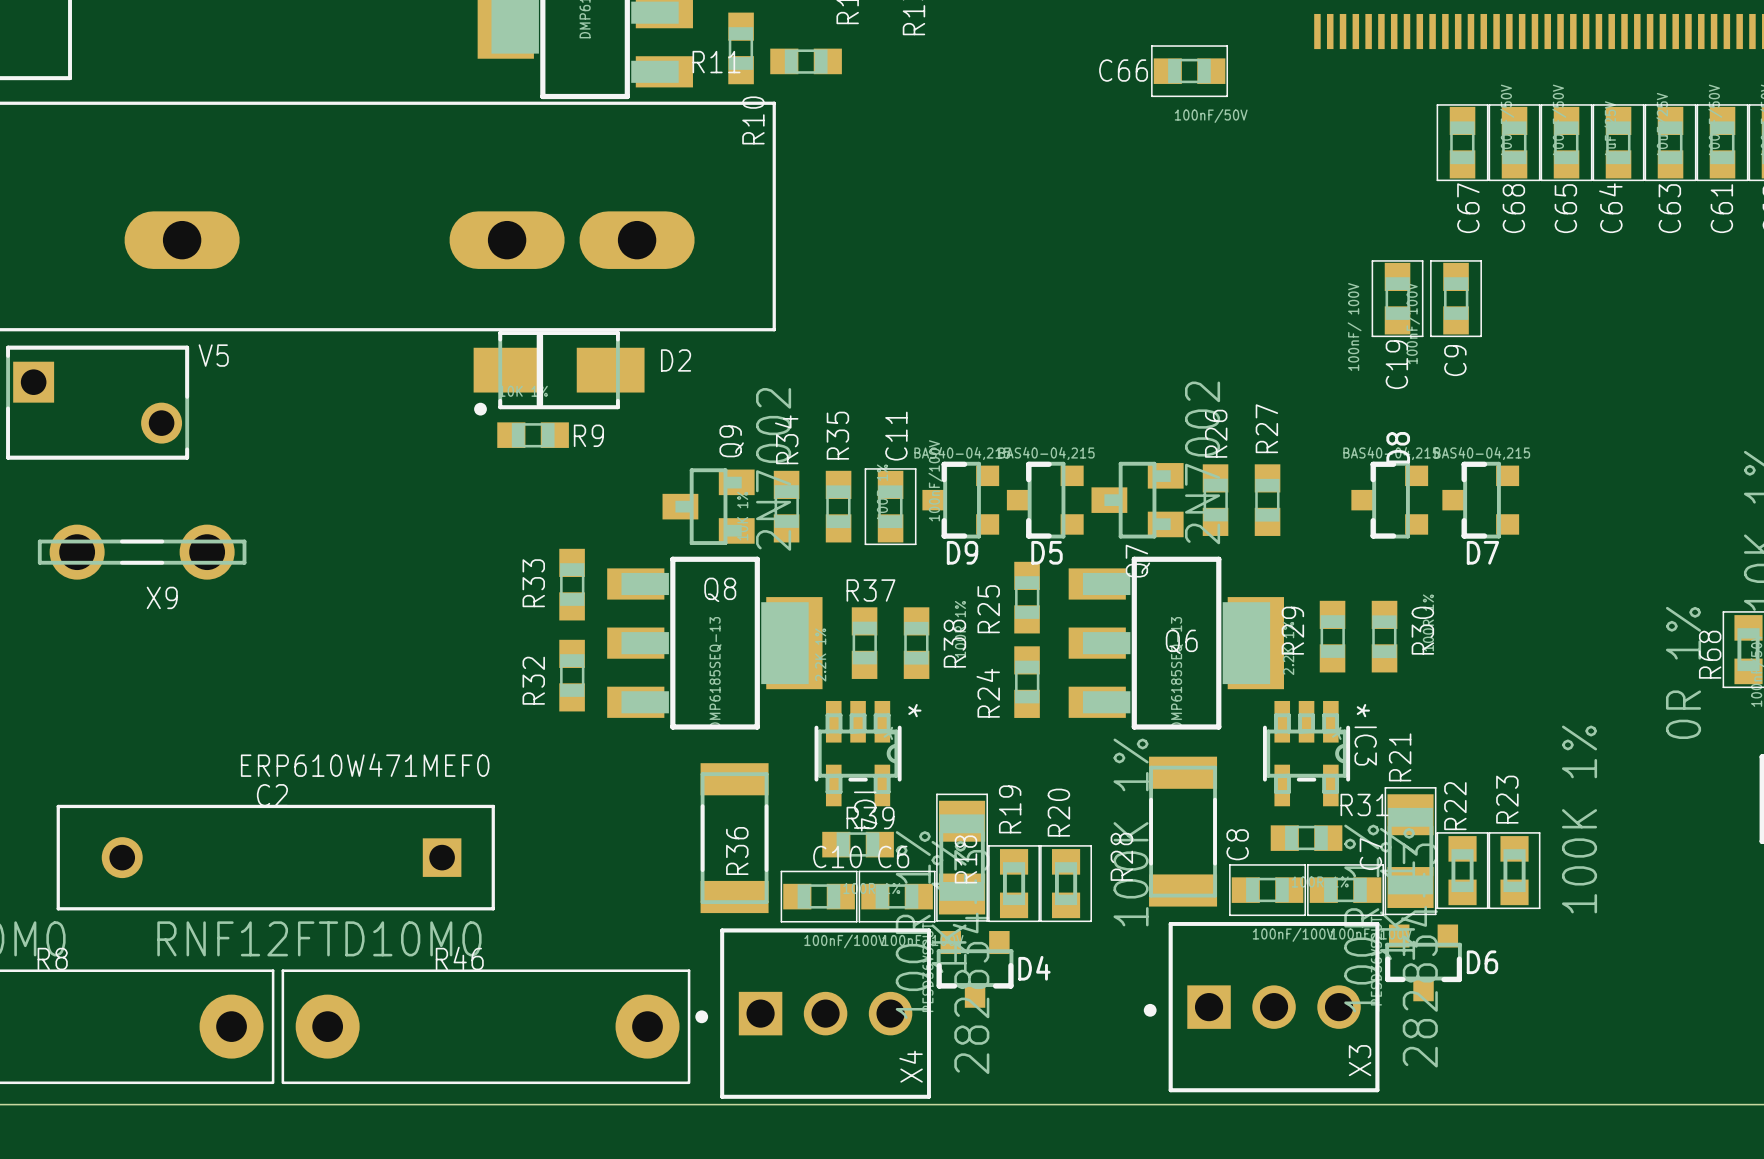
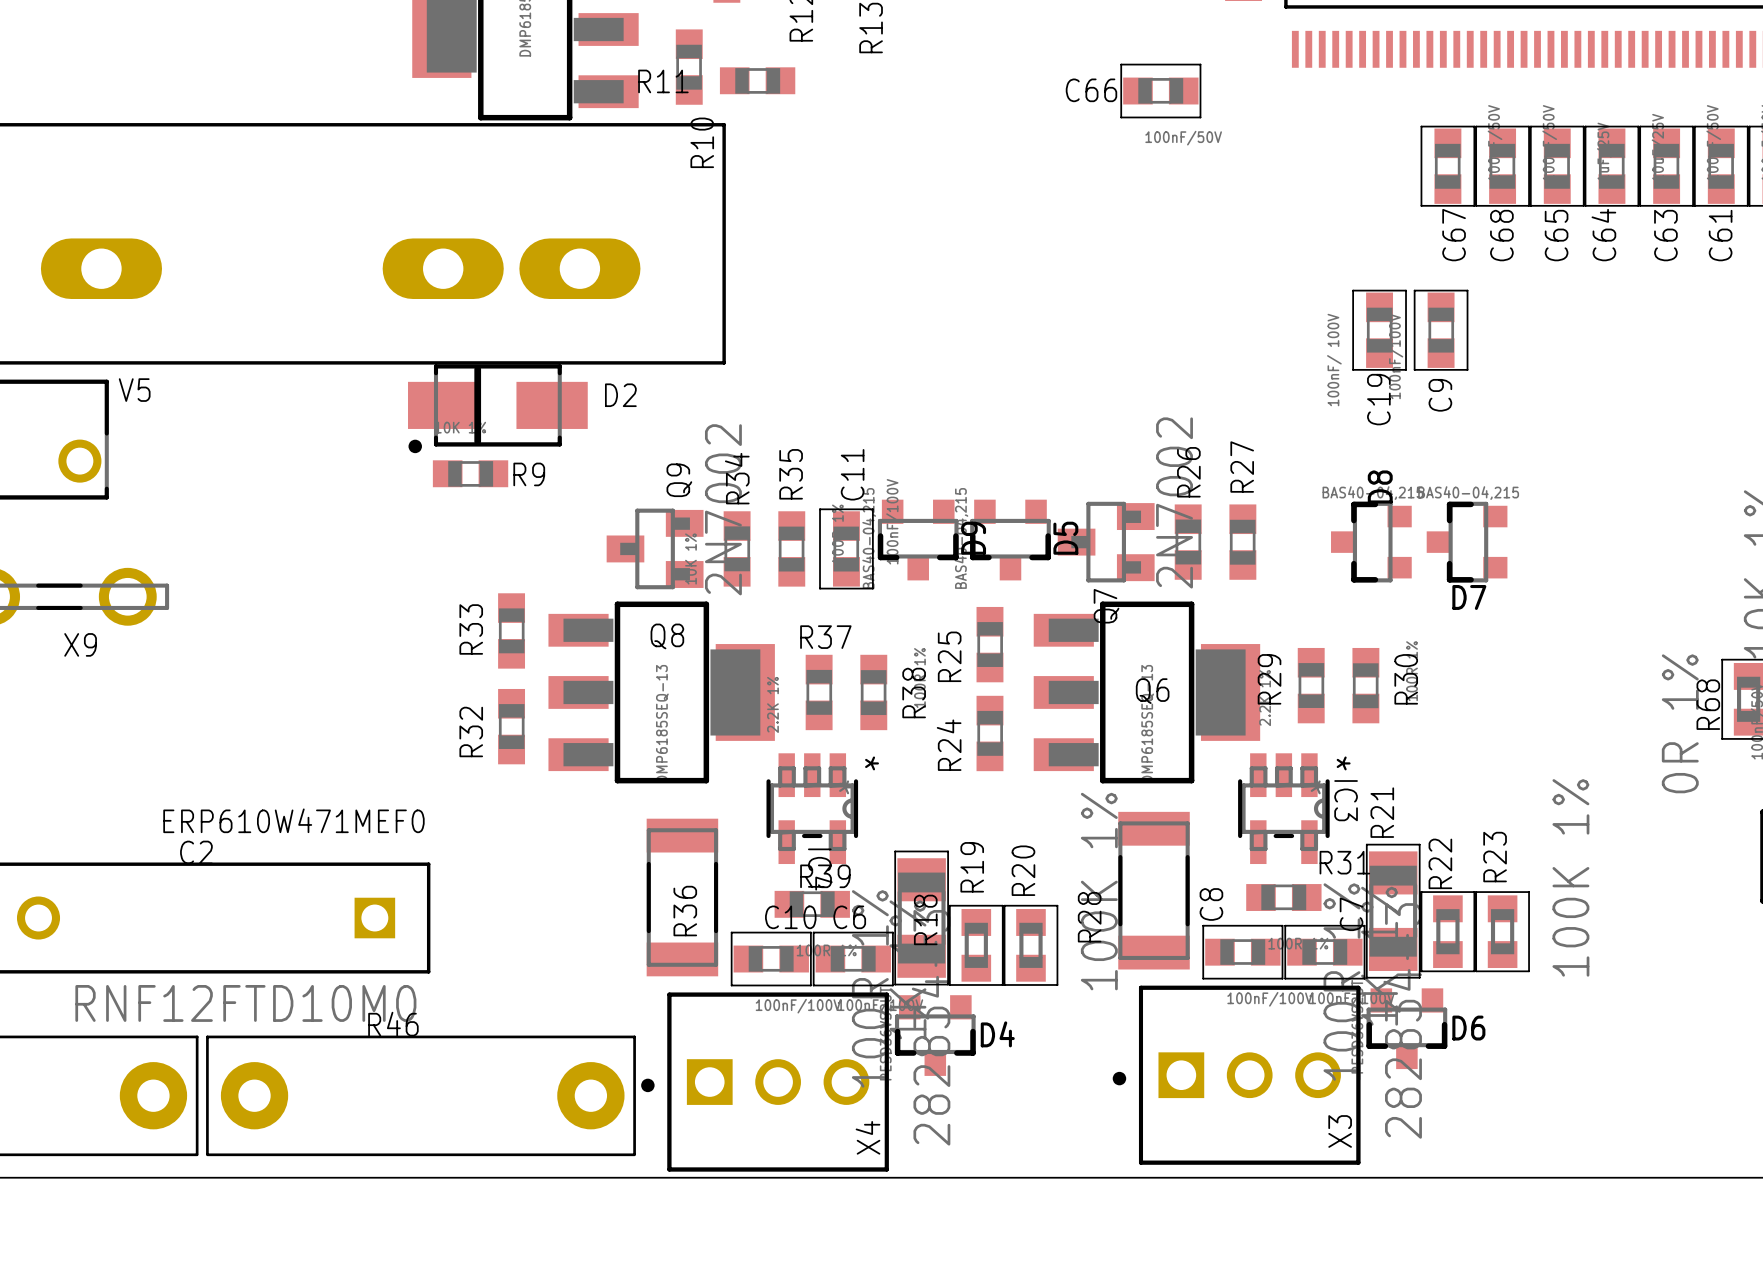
D9 rotation: 0° (960, 500) -> 90° counterclockwise (918, 540)
D5 rotation: 0° (1045, 500) -> 90° counterclockwise (1010, 540)

